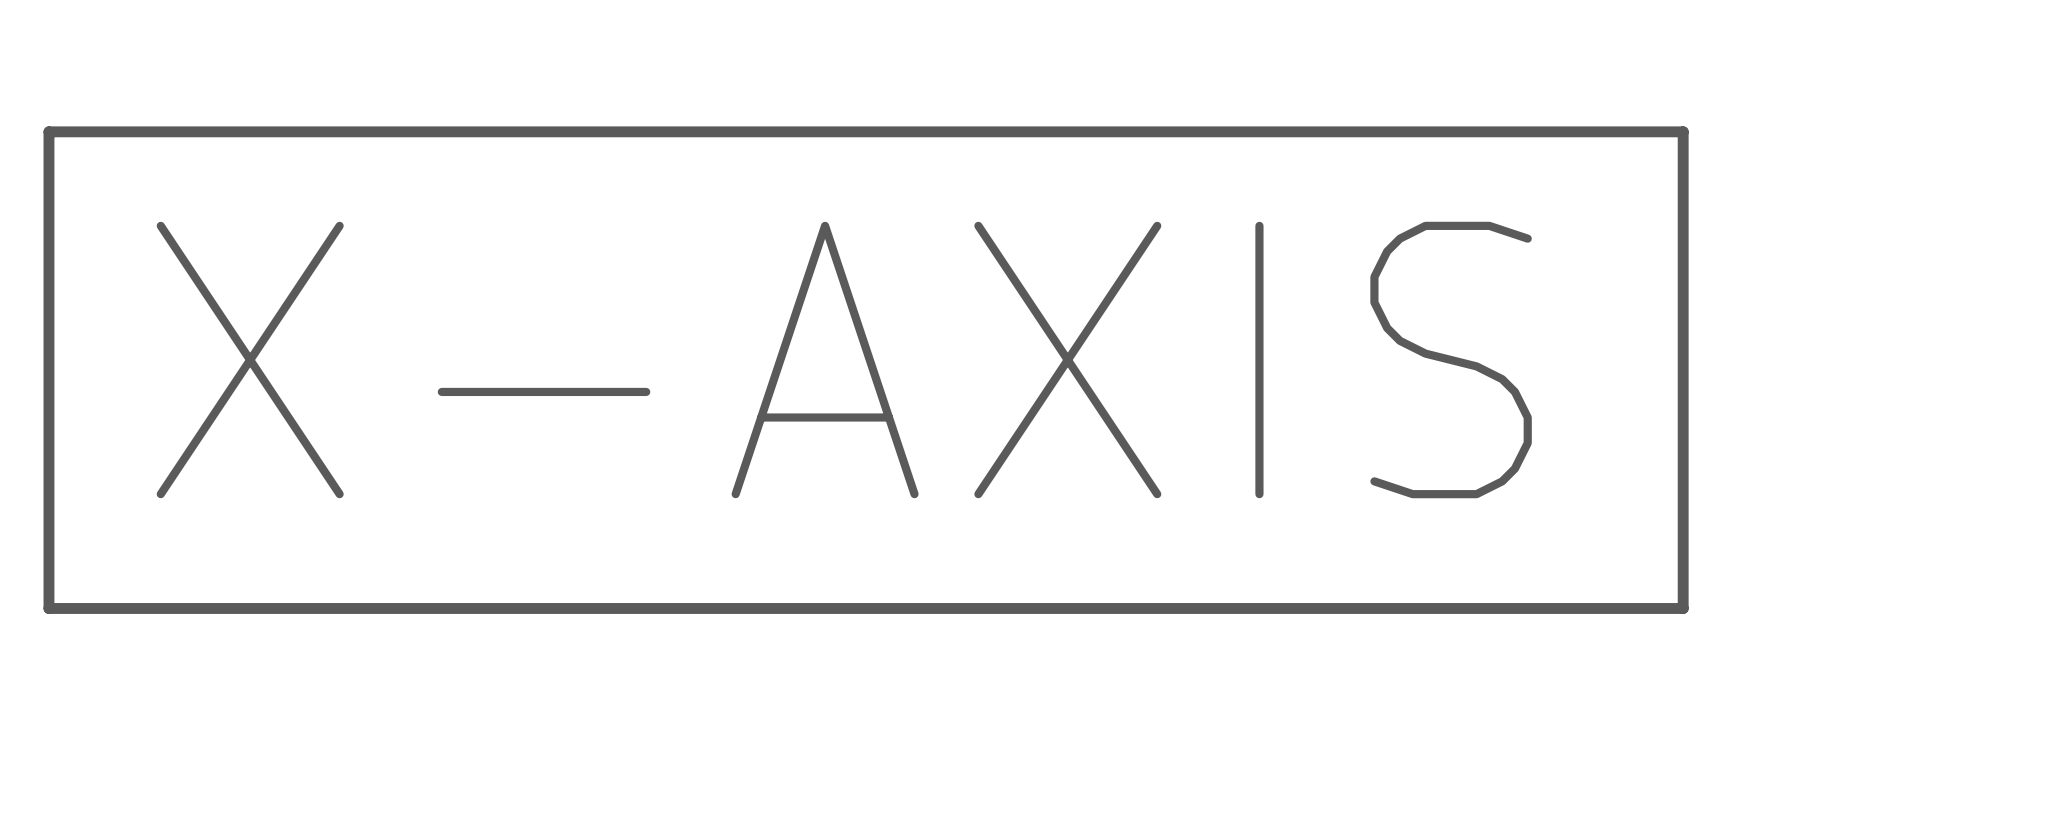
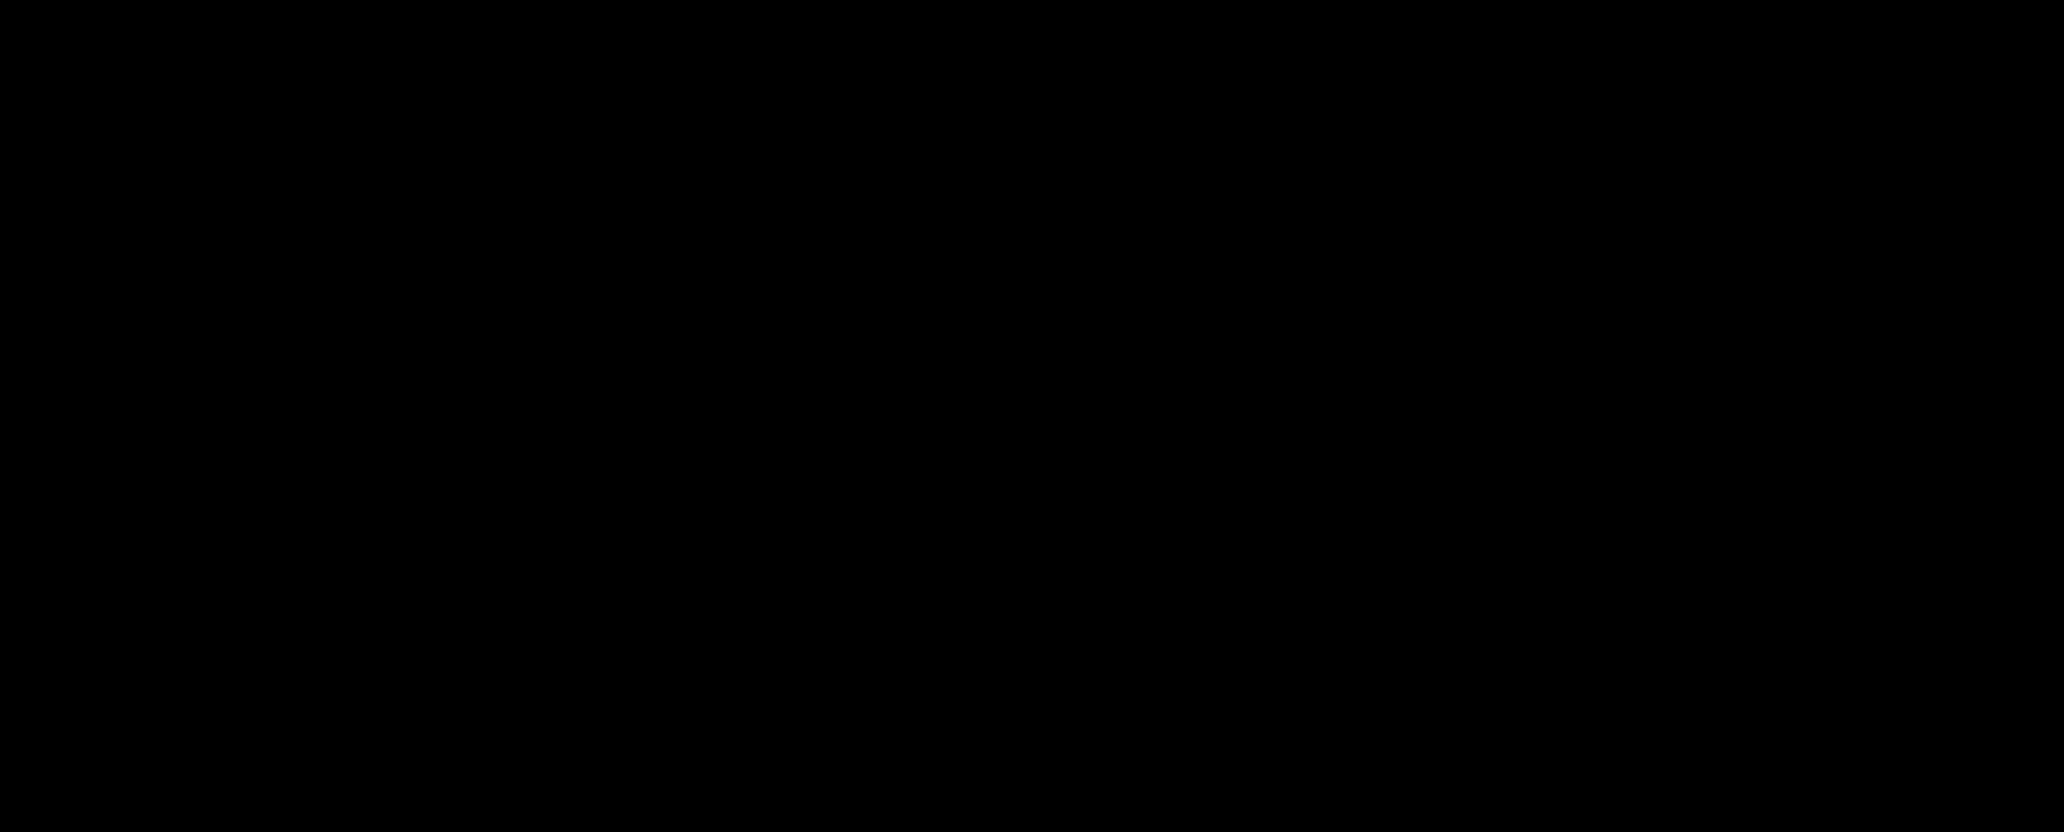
line: (48, 131) (48, 608) (1683, 608) (1683, 131) (48, 131) -> none
text: X-AXIS (844, 360) -> none

